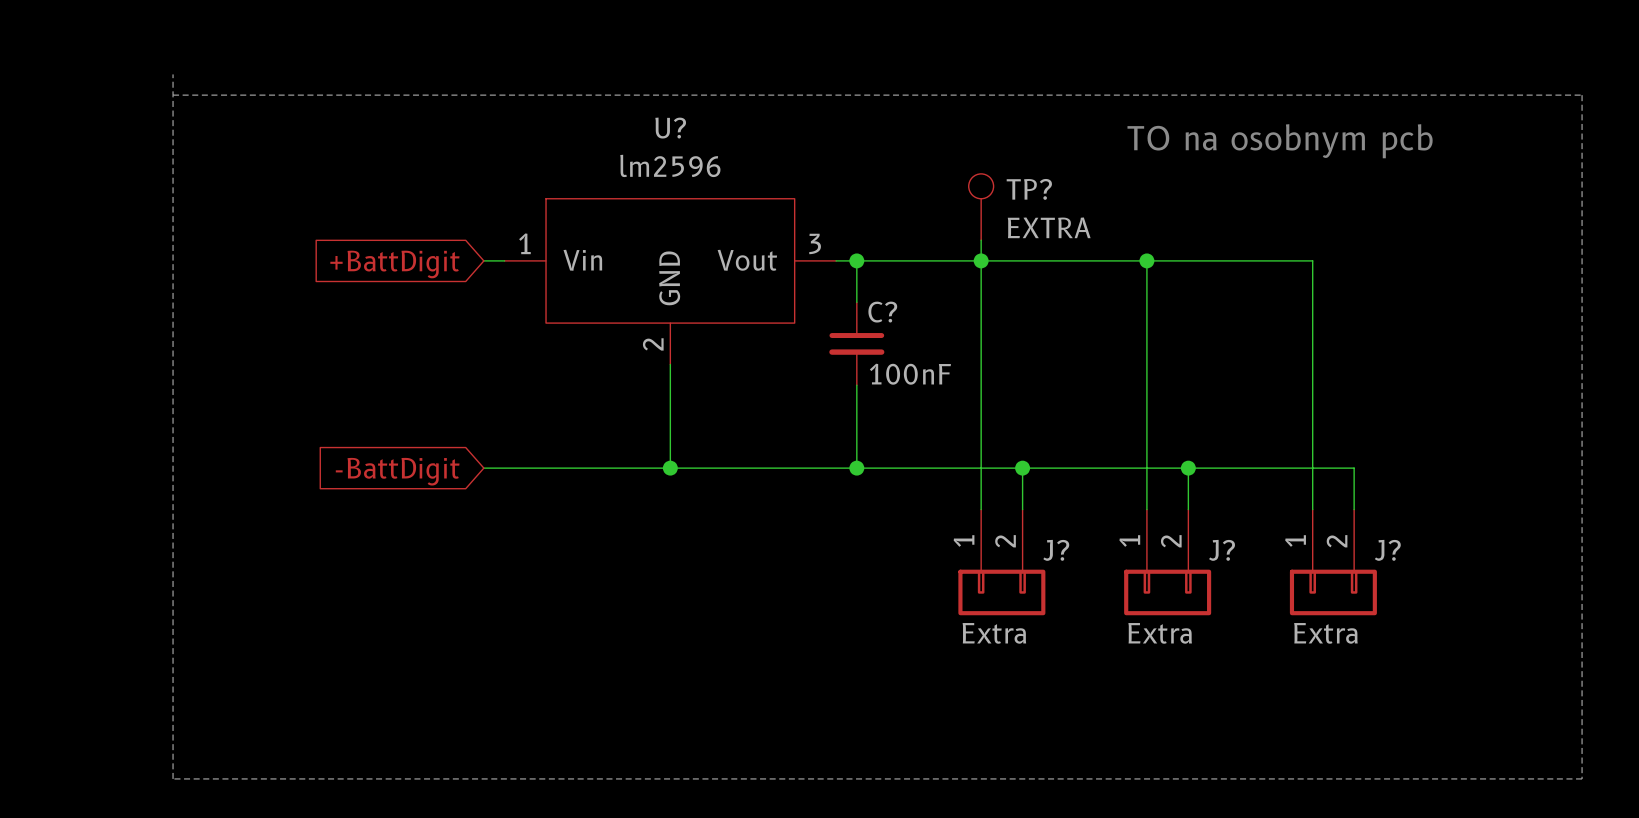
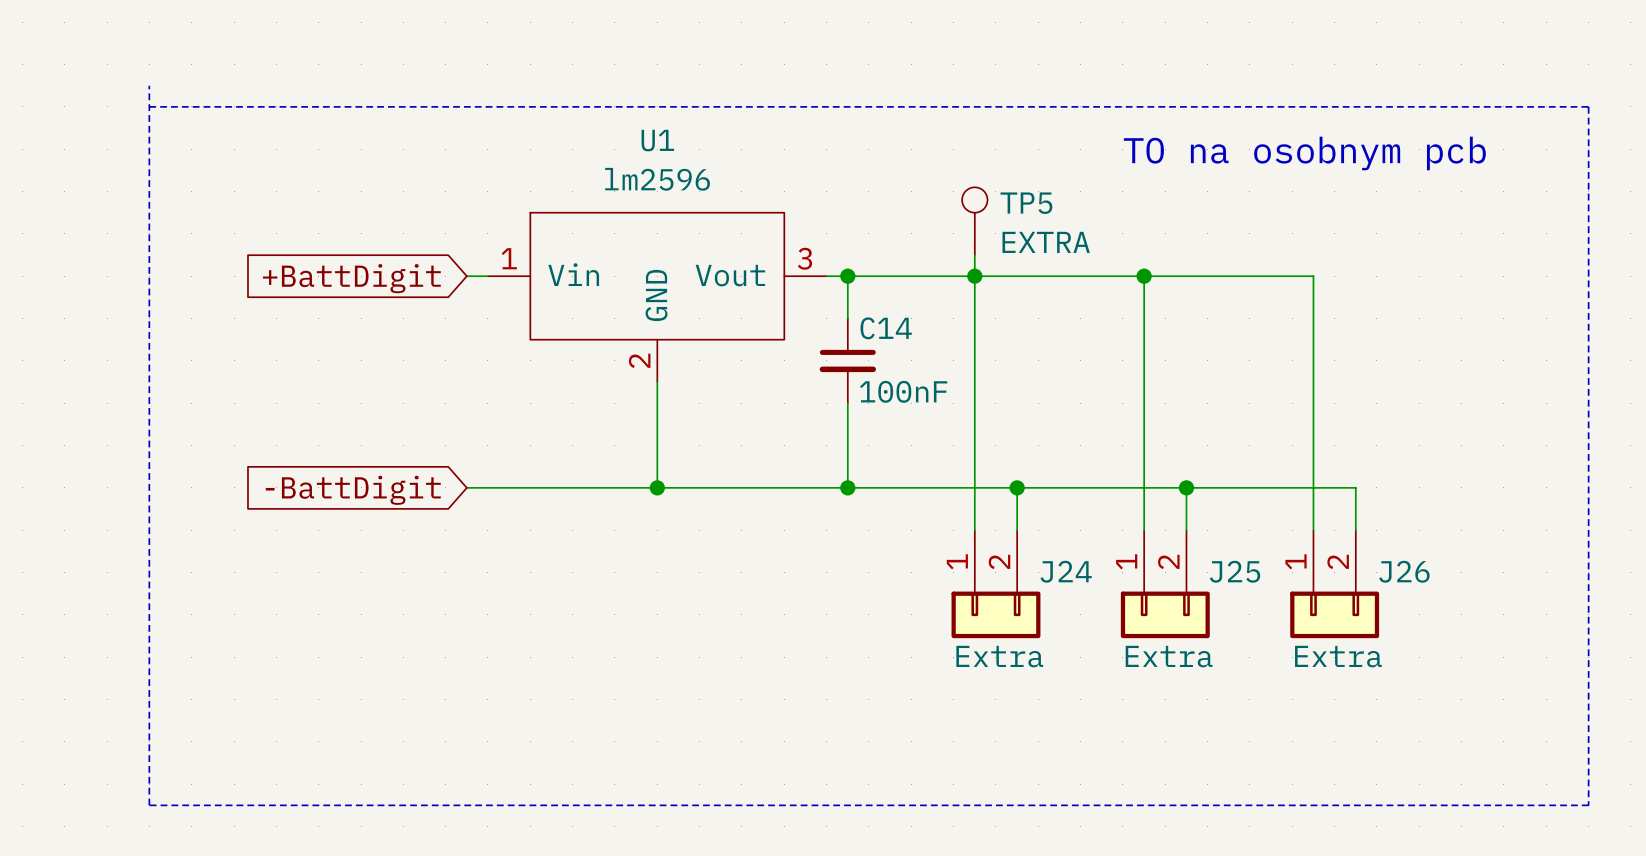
U? name: U? (670, 128) -> U1 (657, 140)
TP? name: TP? (1029, 189) -> TP5 (1026, 203)
C? name: C? (882, 312) -> C14 (886, 328)
J? name: J? (1056, 550) -> J24 (1066, 571)
J? name: J? (1222, 550) -> J25 (1235, 571)
J? name: J? (1387, 550) -> J26 (1404, 571)

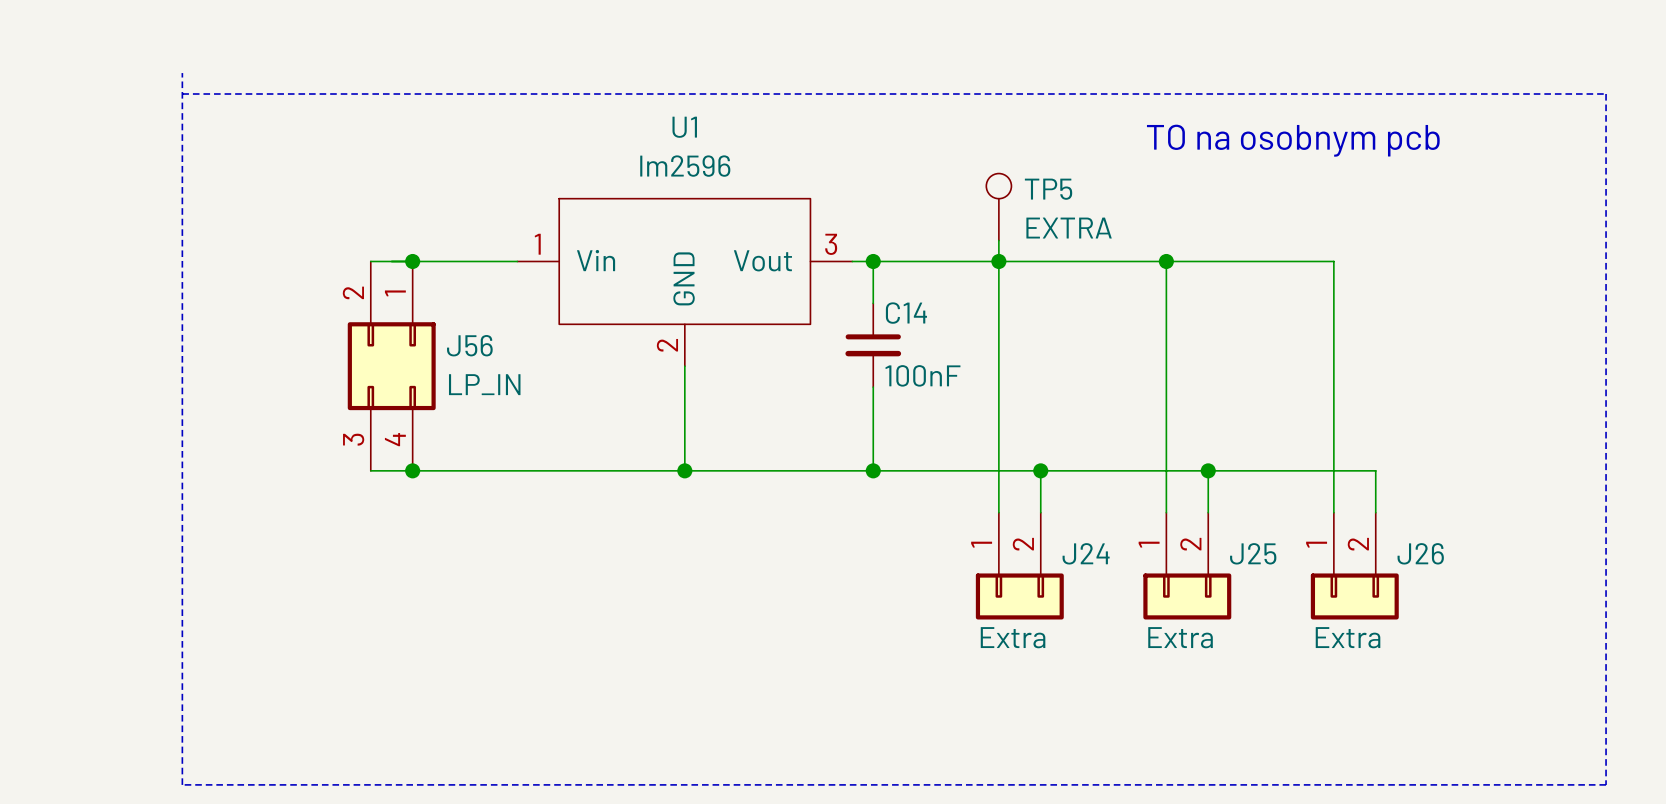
wire: none -> (370, 261) (496, 261)
junction: none -> (412, 261)
global label: +BattDigit (351, 278) -> none
J56: none -> LP_IN (391, 366)
wire: none -> (370, 470) (496, 470)
junction: none -> (412, 470)
global label: -BattDigit (353, 490) -> none

